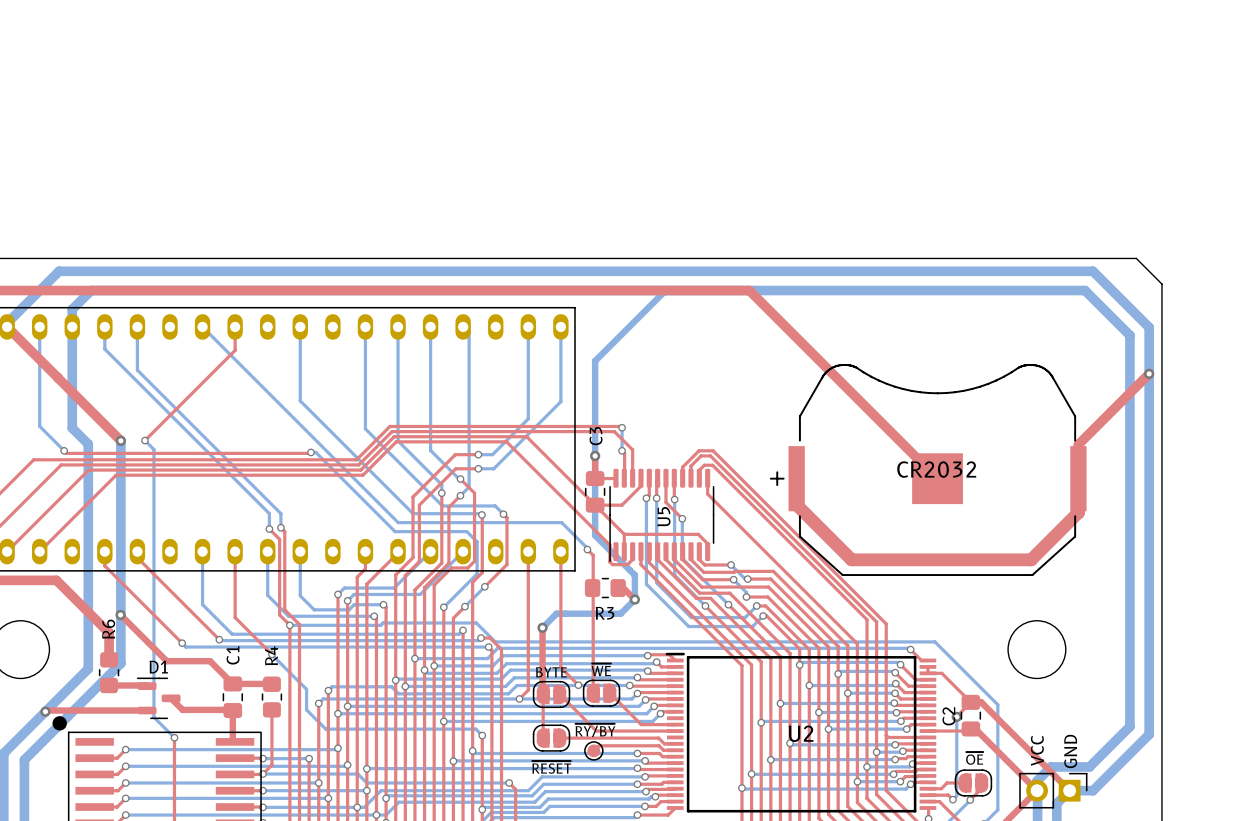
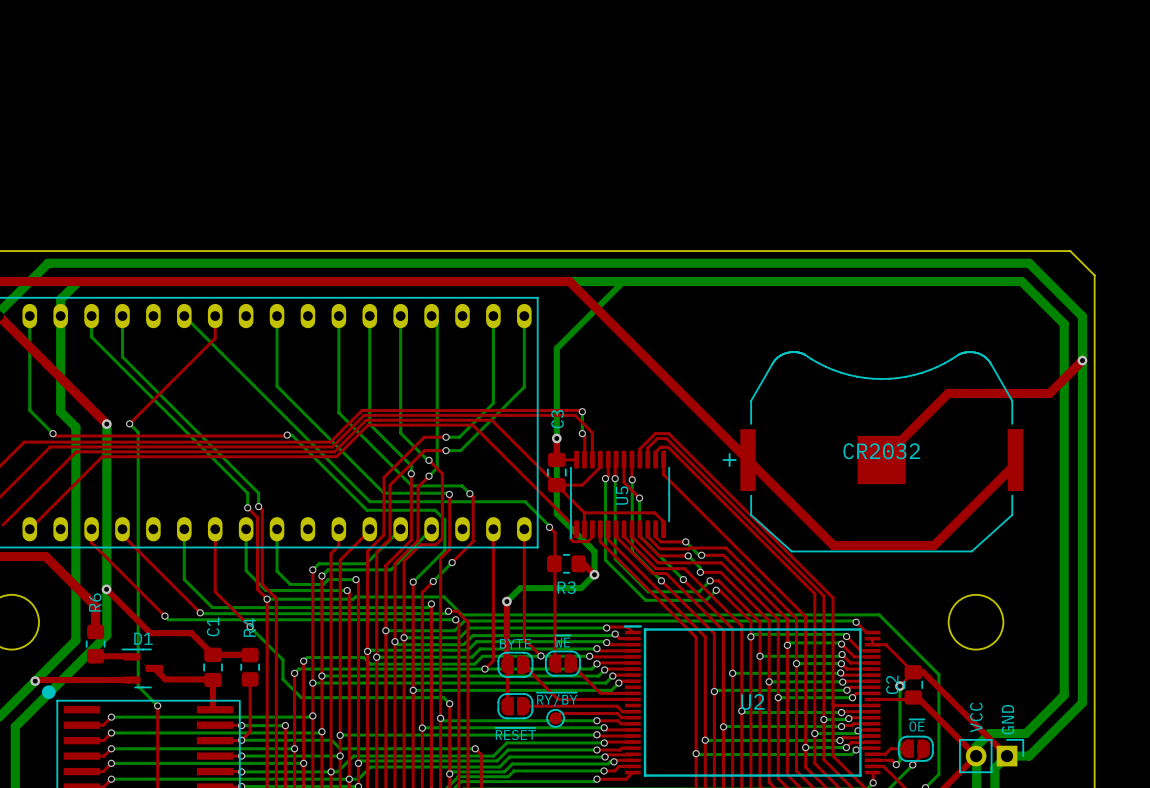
top track: (608, 290) (749, 290) (937, 478) -> (569, 281) (833, 545) (934, 545) (1015, 464)
top track: (1114, 408) (1078, 444) (1078, 478) -> (1049, 393) (948, 393) (881, 460)
top track: (796, 478) (796, 504) (851, 559) (1031, 559) (1078, 512) (1078, 483) -> none

